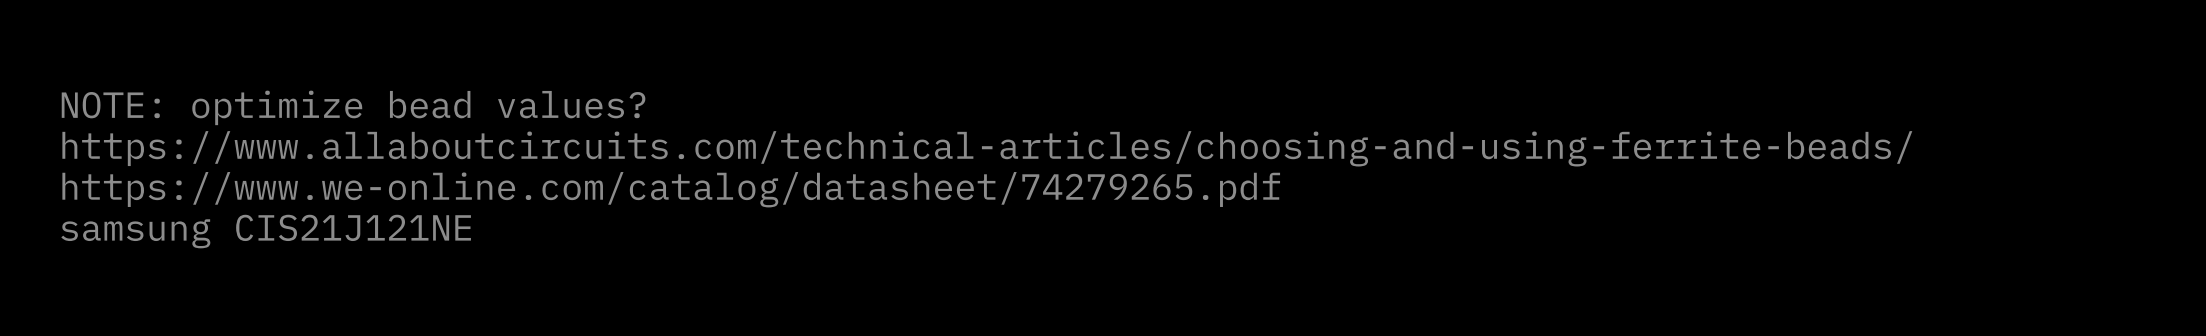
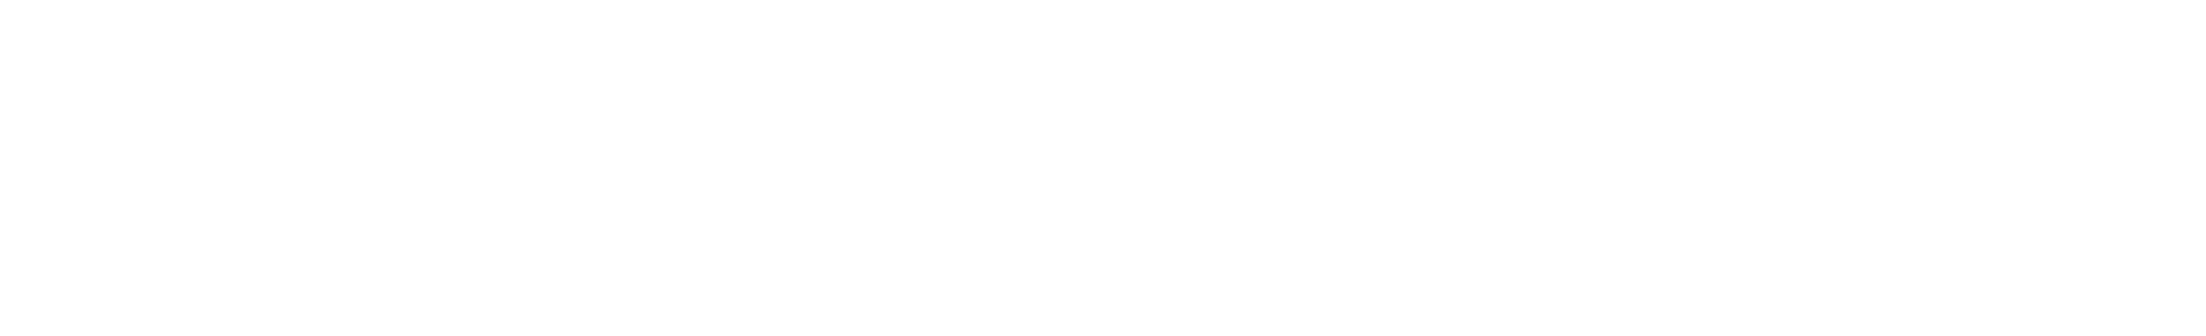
text: NOTE: optimize bead values? (353, 107) -> none
text: https://www.allaboutcircuits.com/technical-articles/choosing-and-using-ferrite-beads/ (987, 148) -> none
text: https://www.we-online.com/catalog/datasheet/74279265.pdf (671, 189) -> none
text: samsung CIS21J121NE (266, 231) -> none

